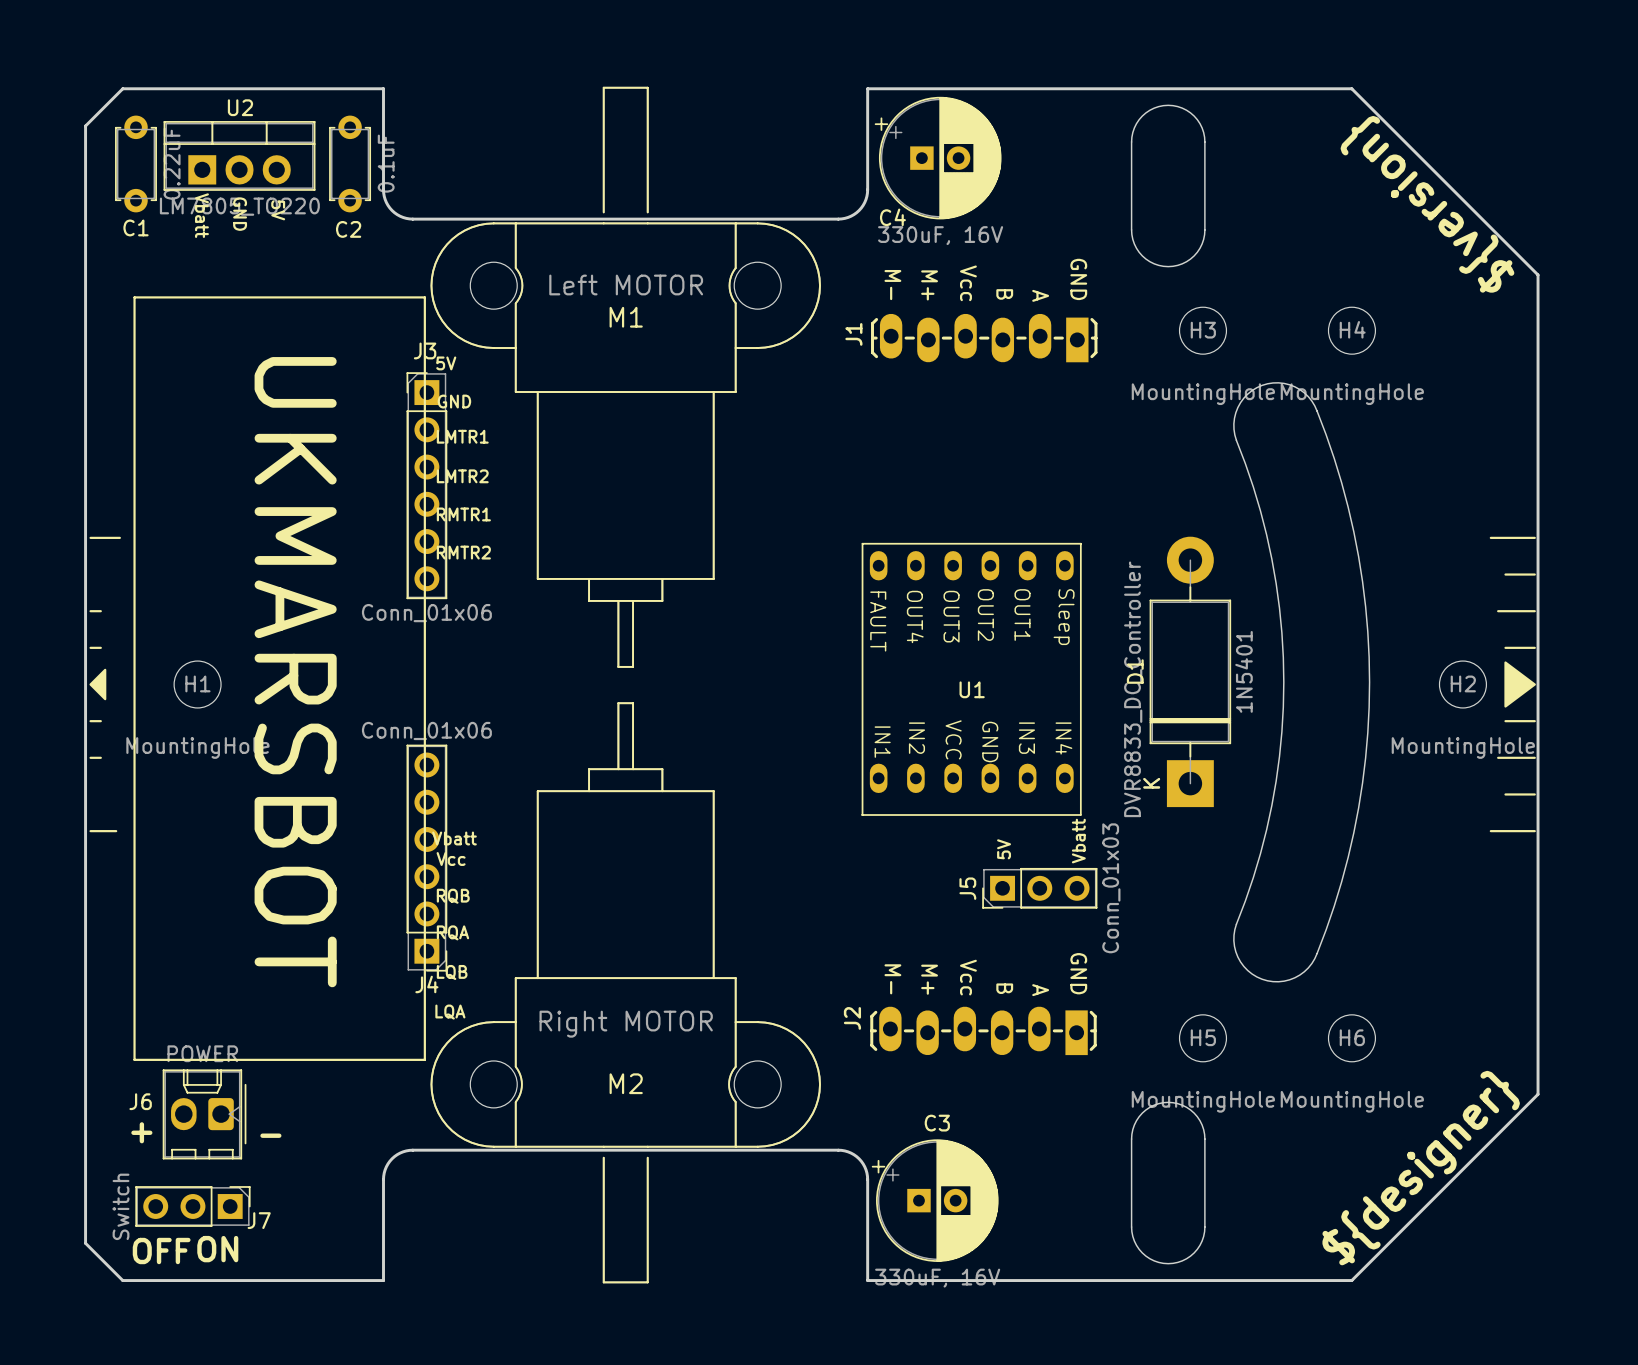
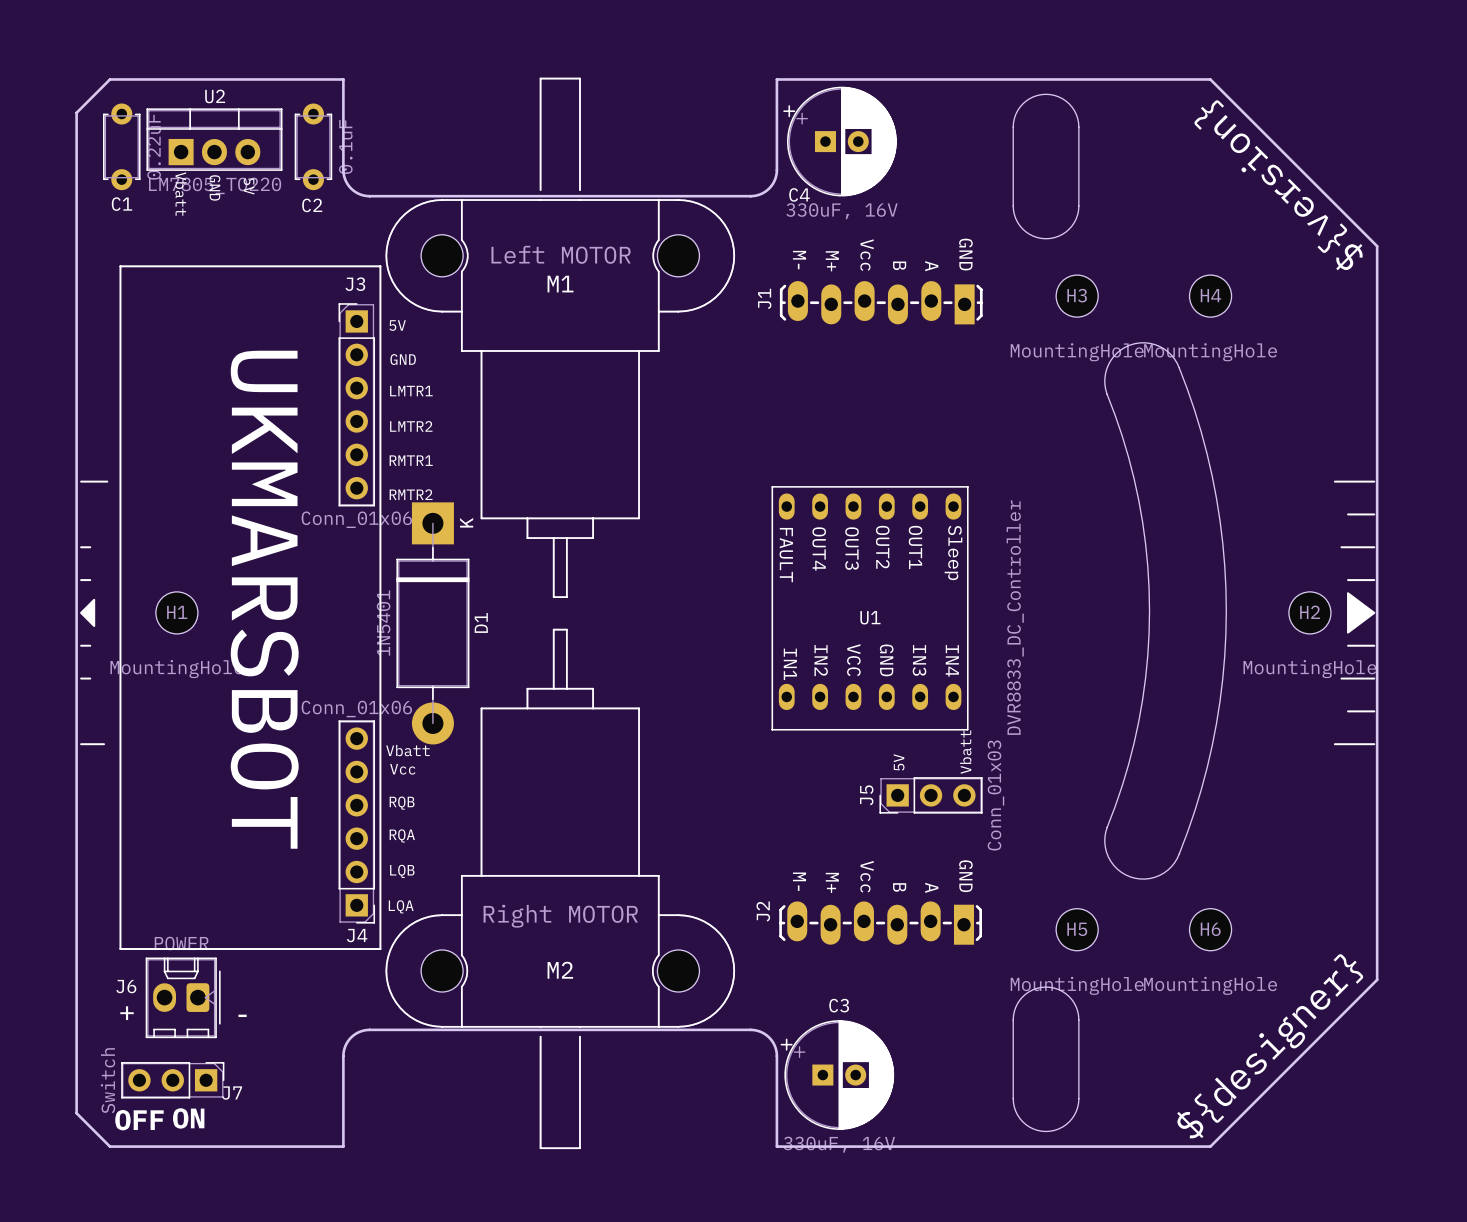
J3 position: (426, 485) -> (356, 404)
D1 rotation: 0° (1190, 671) -> 180° (432, 623)
D1 position: (1190, 671) -> (432, 623)
J4 position: (426, 858) -> (356, 821)

